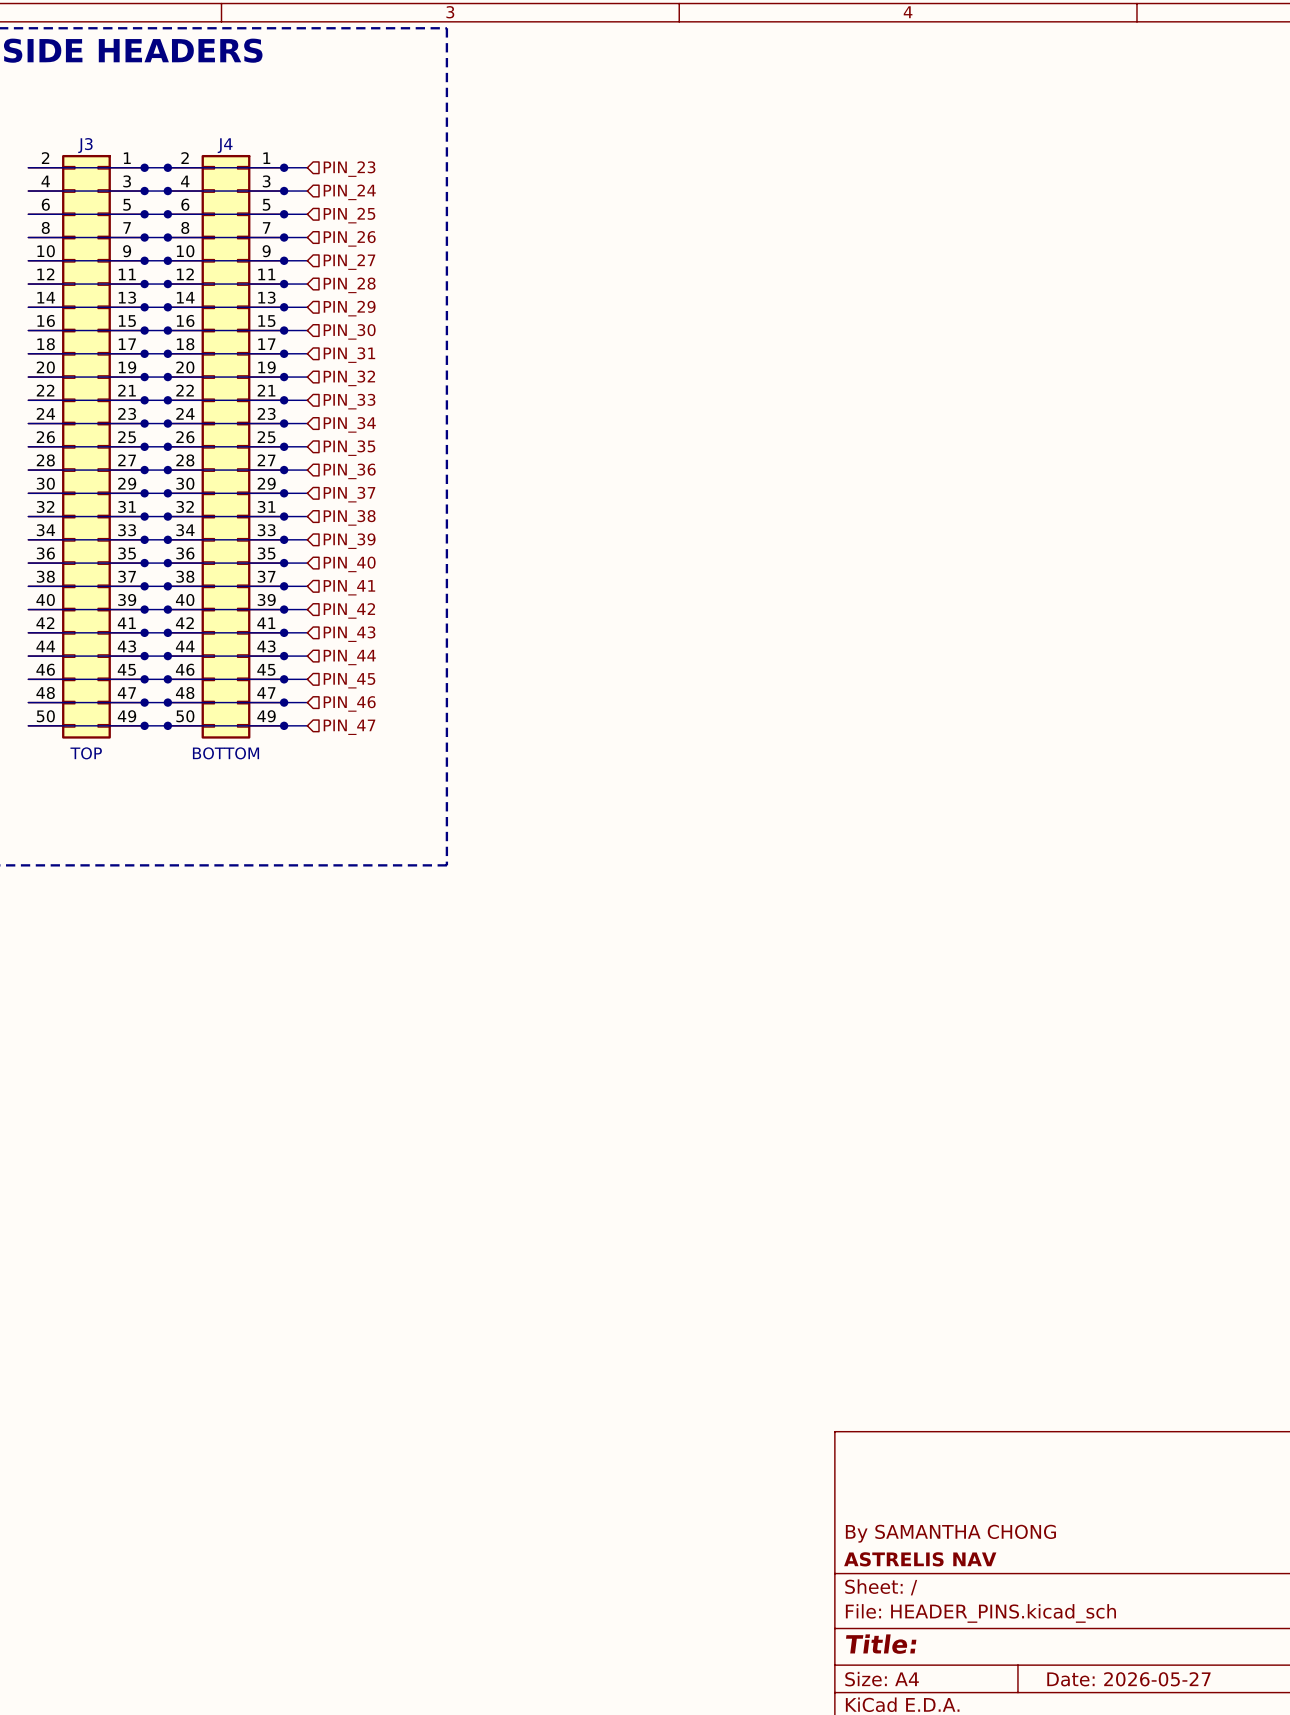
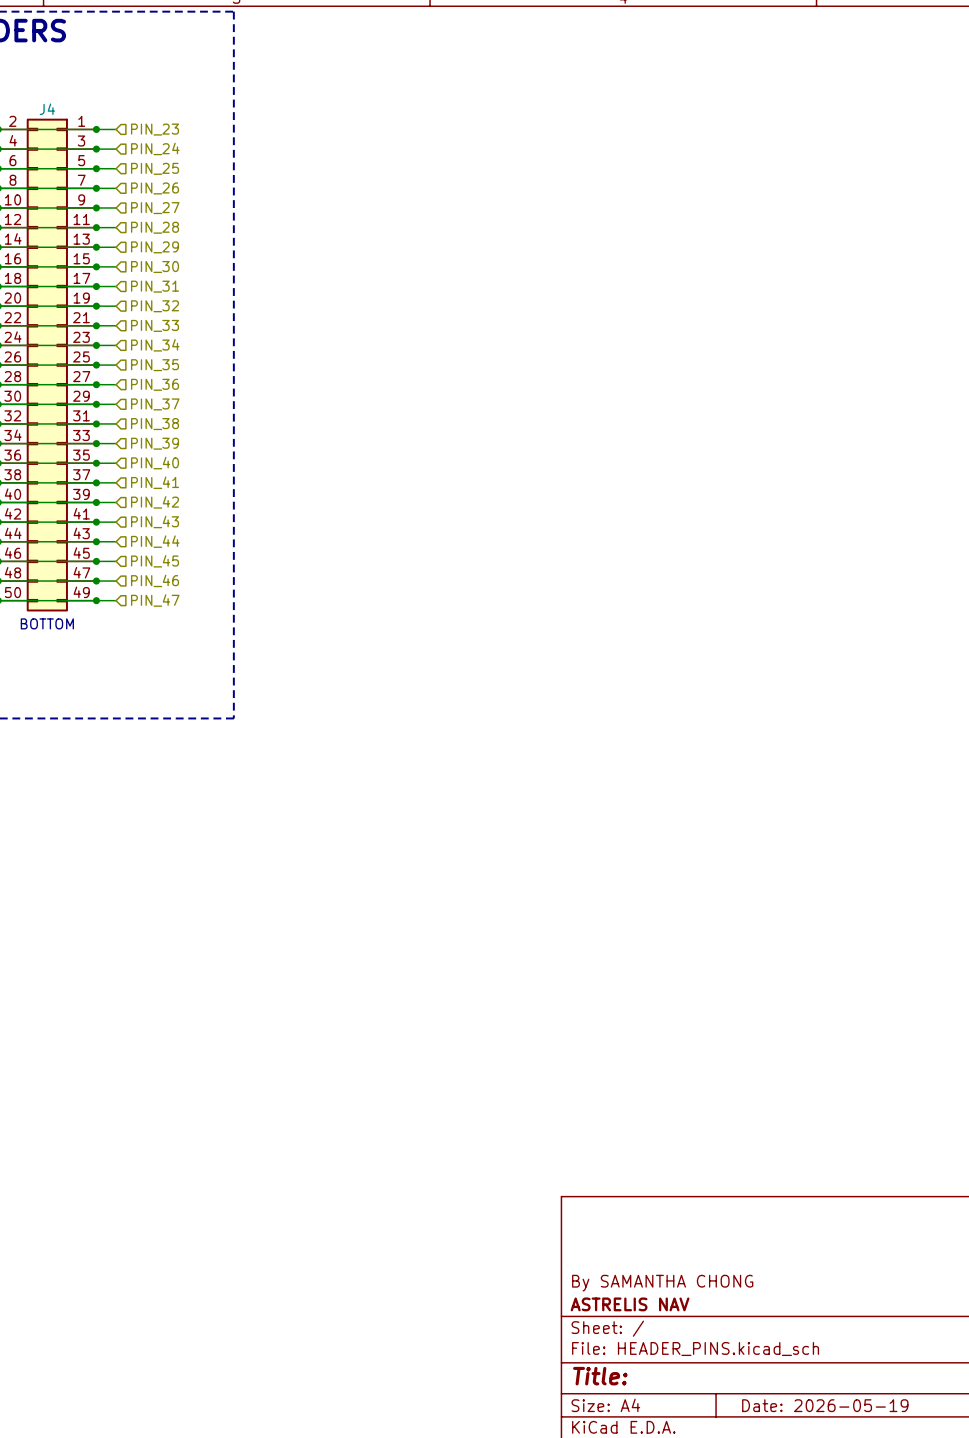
title block: Date: 2026-05-27 (1128, 1679) -> Date: 2026-05-19 (825, 1405)

